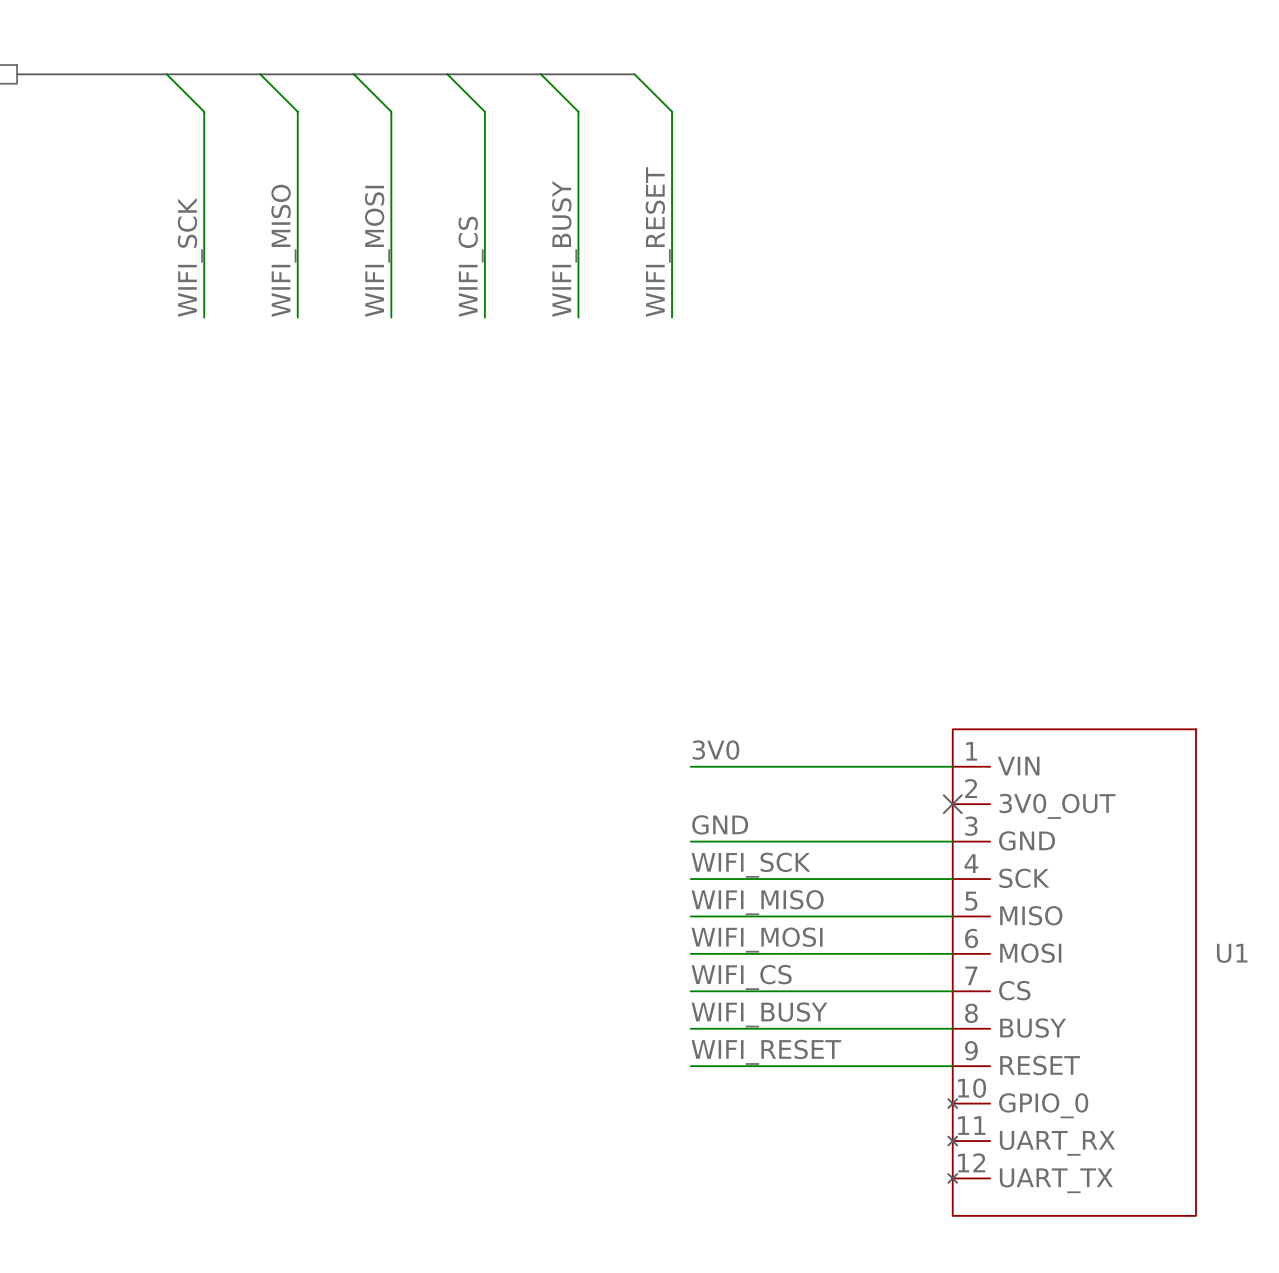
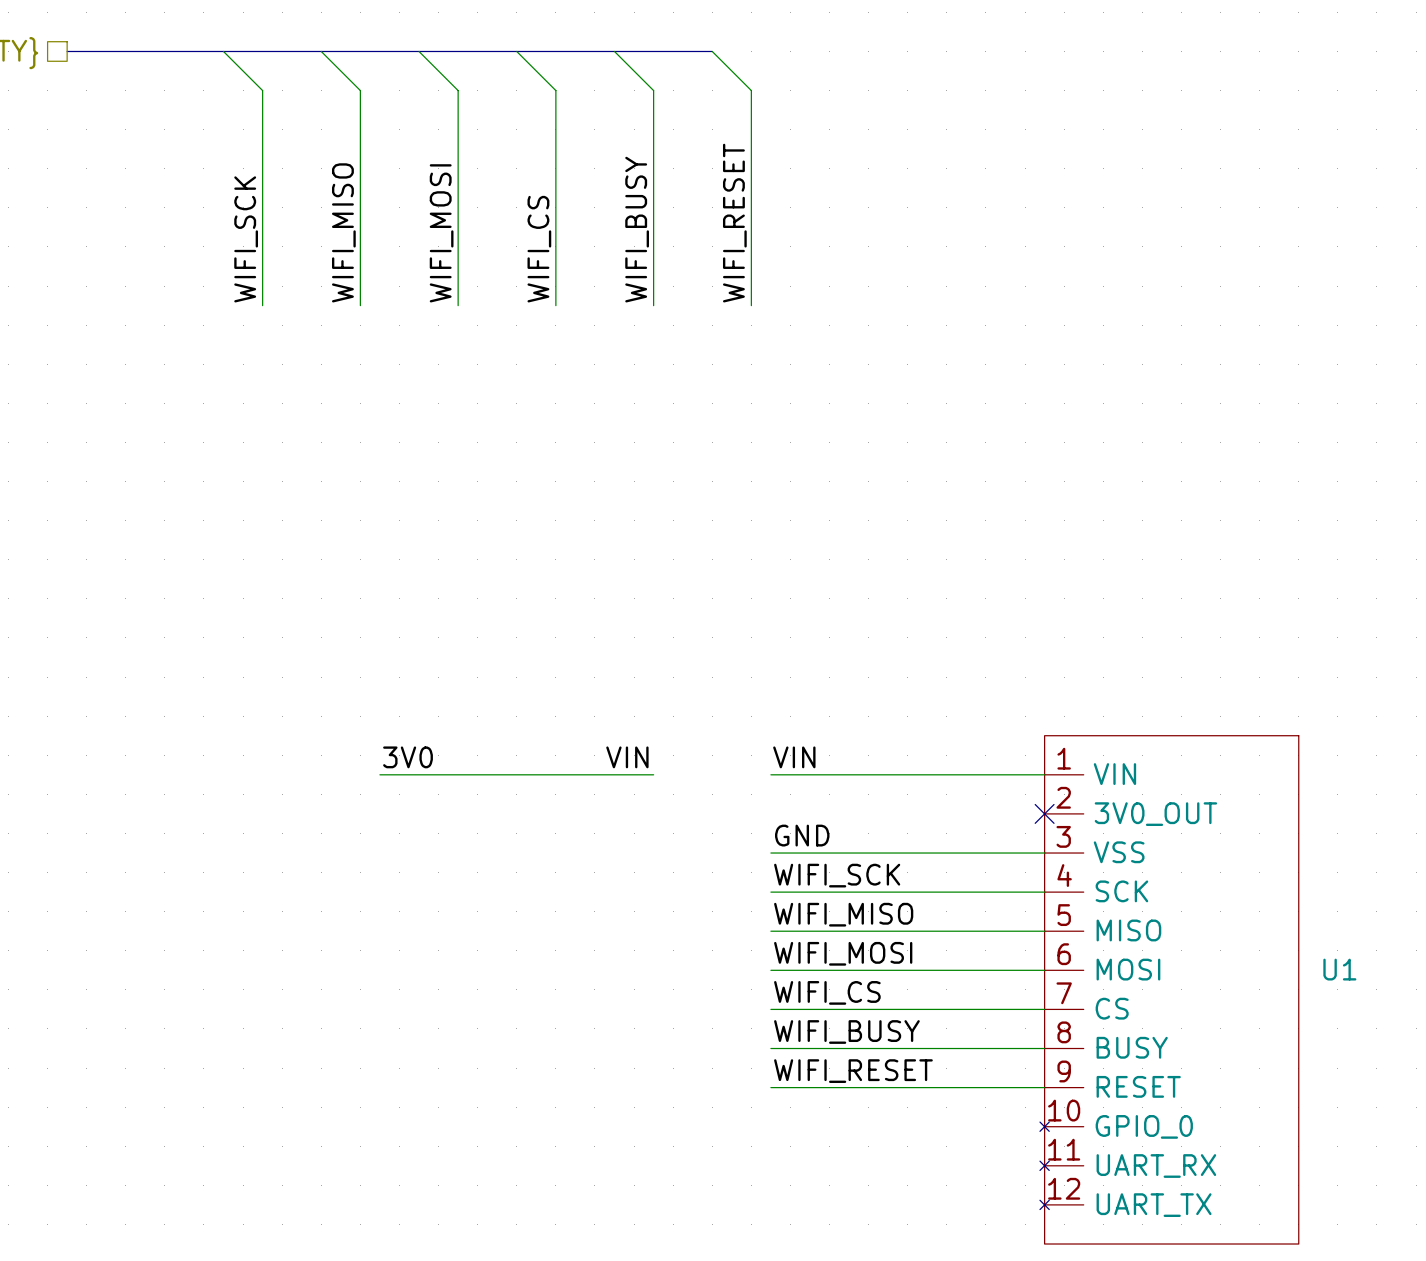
label: none -> 3V0 (408, 757)
label: none -> VIN (627, 757)
label: 3V0 (715, 750) -> VIN (794, 757)
wire: none -> (379, 774) (653, 774)
U1 pin name: GND (1027, 840) -> VSS (1119, 852)

